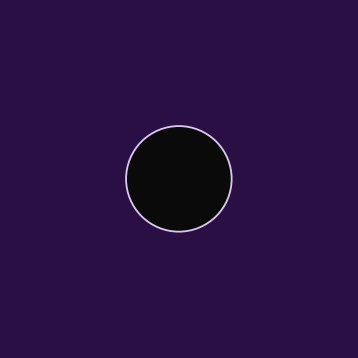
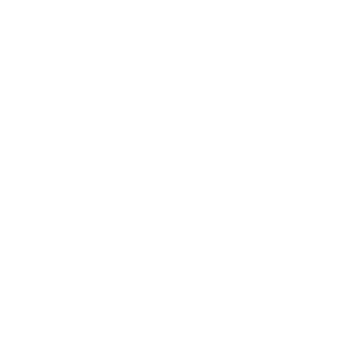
part: (178, 178) -> none

